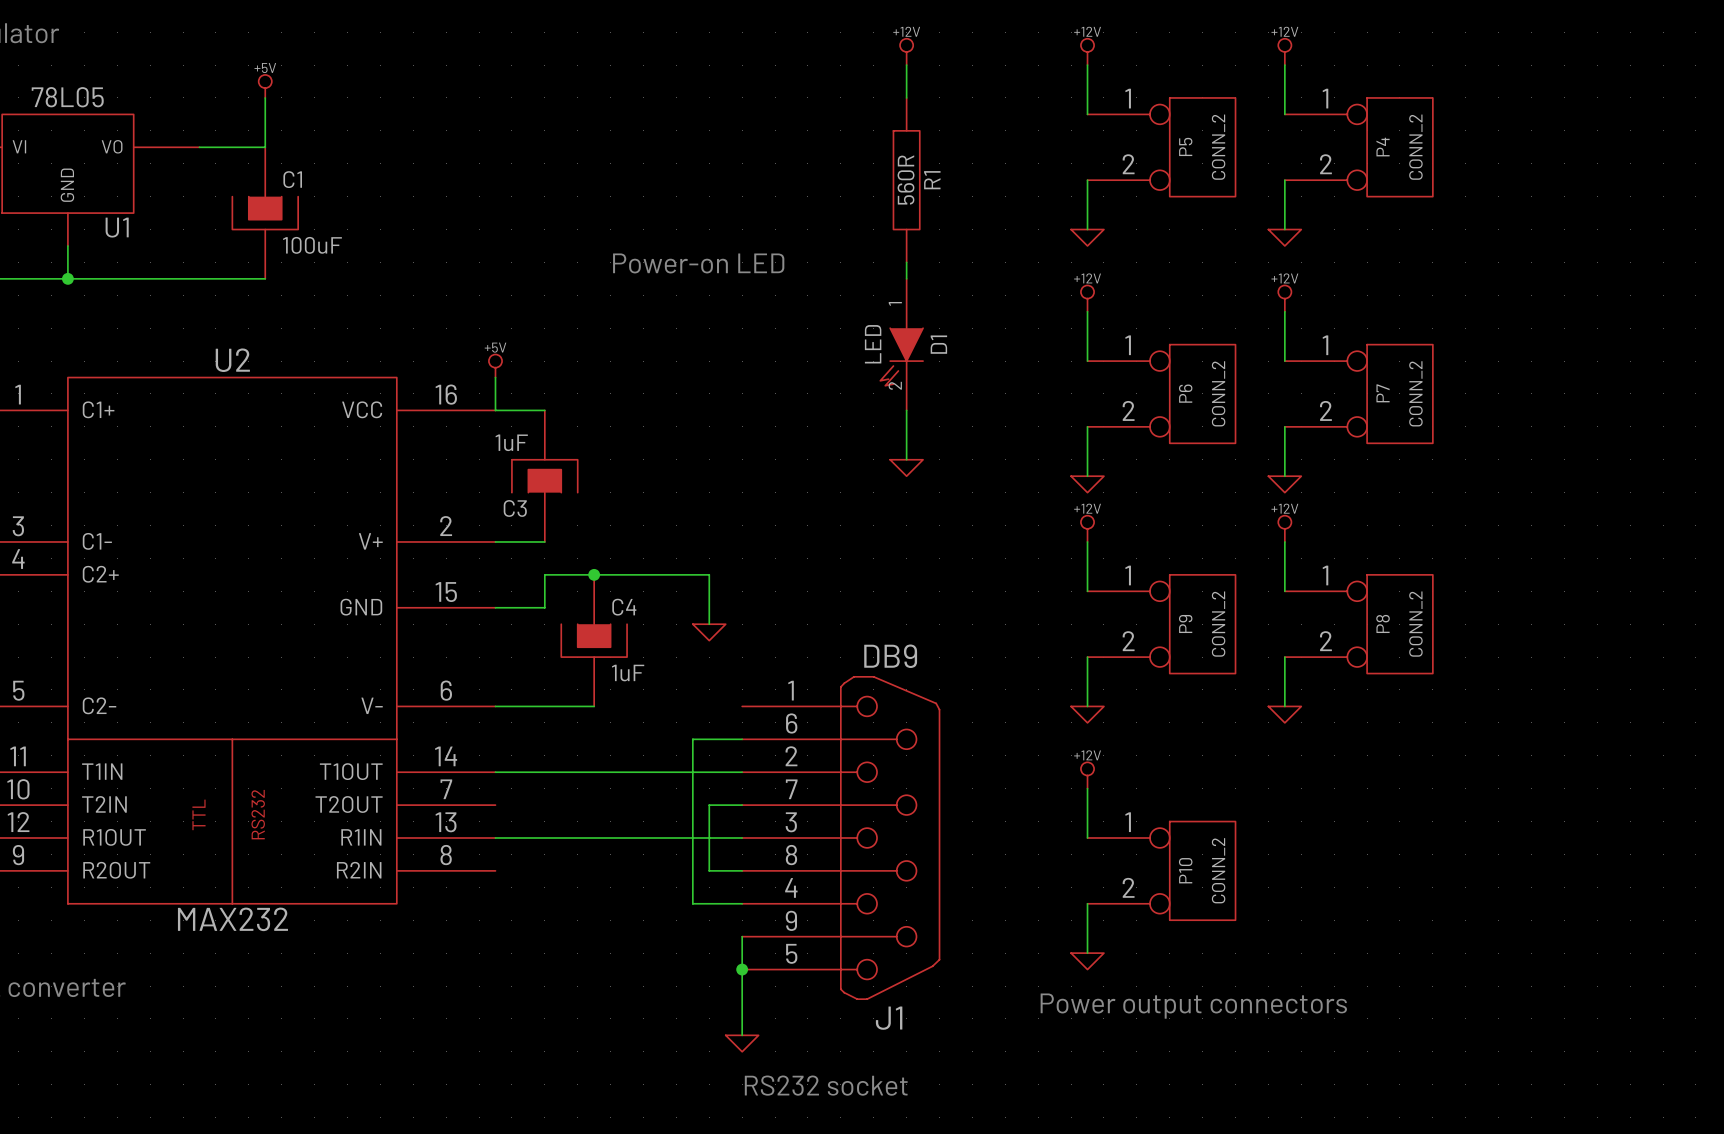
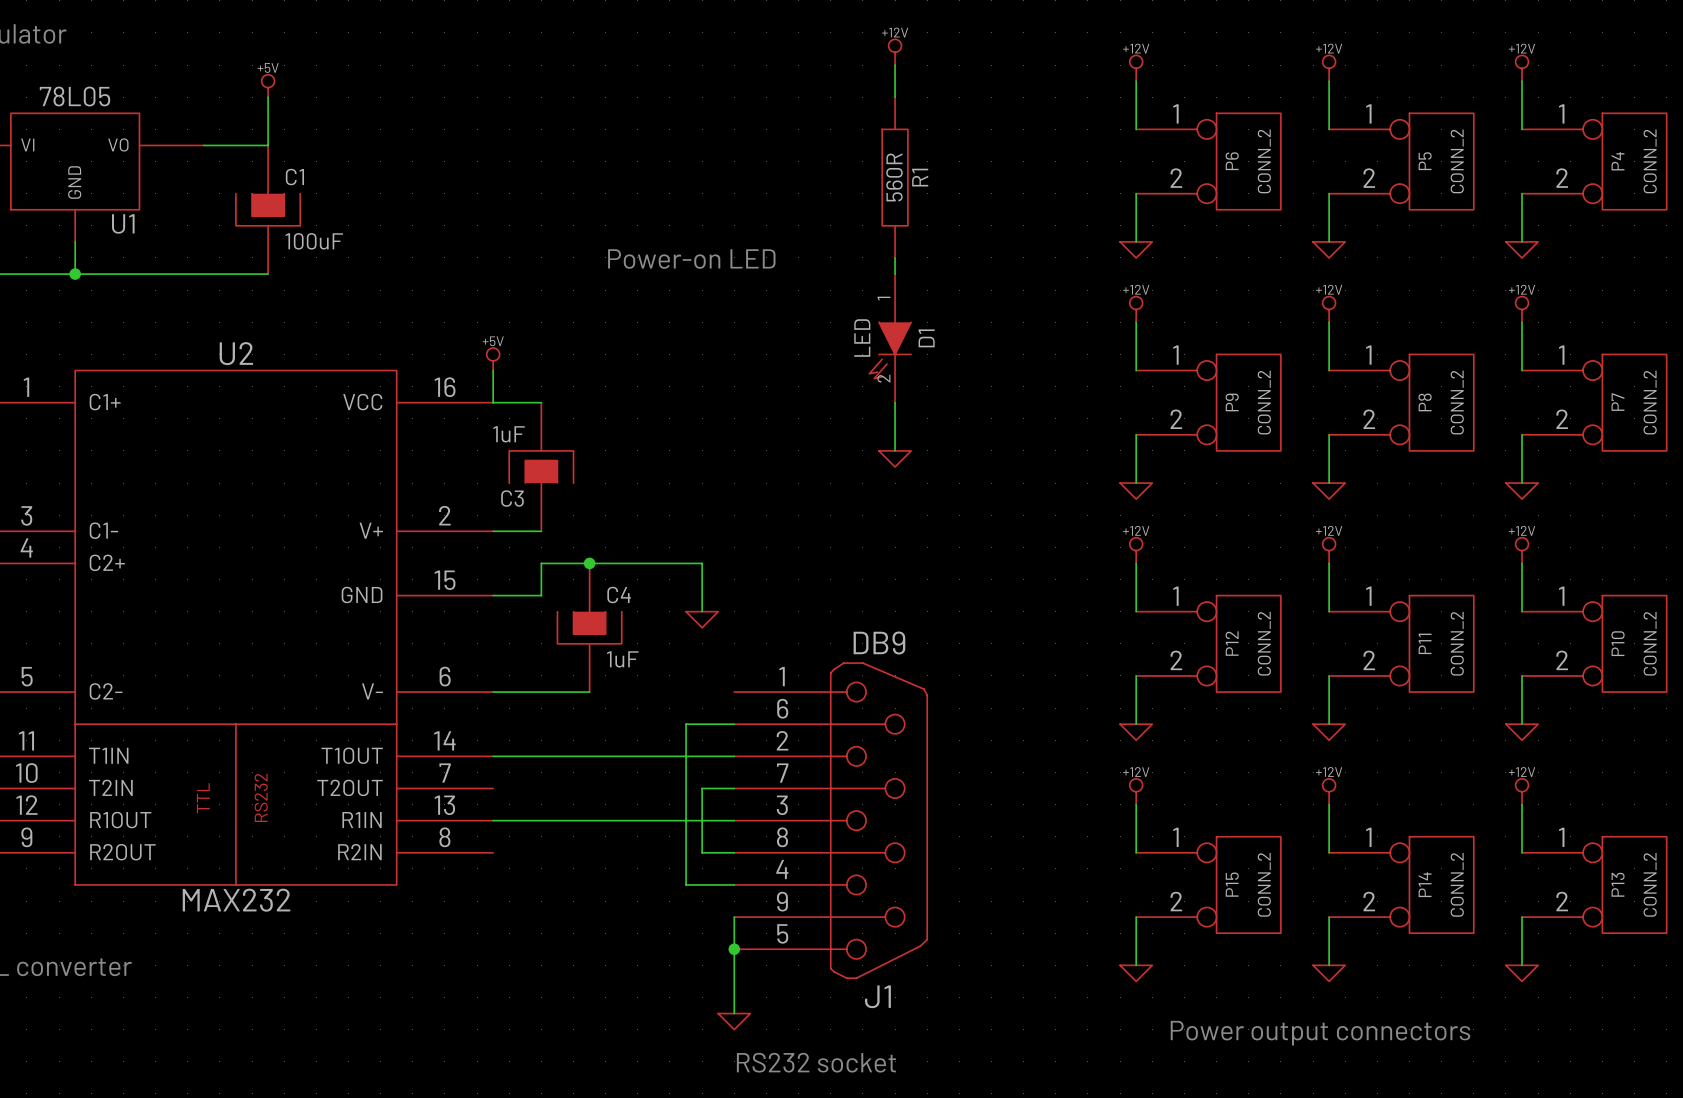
power symbol: +12V (1087, 51) -> none
power symbol: +12V (1284, 51) -> none
wire: (1087, 65) (1087, 114) -> (1136, 81) (1136, 129)
wire: (1284, 65) (1284, 114) -> (1329, 81) (1329, 129)
power symbol: none -> +12V (1136, 68)
power symbol: none -> +12V (1329, 68)
power symbol: none -> +12V (1522, 68)
wire: none -> (1522, 81) (1522, 129)
P5 position: (1161, 147) -> (1401, 161)
P4 position: (1358, 147) -> (1594, 161)
wire: (1087, 180) (1087, 229) -> (1136, 193) (1136, 241)
wire: (1284, 180) (1284, 229) -> (1329, 193) (1329, 241)
wire: none -> (1522, 193) (1522, 241)
power symbol: (1087, 237) -> none
power symbol: (1284, 237) -> none
power symbol: none -> (1136, 249)
power symbol: none -> (1329, 249)
power symbol: none -> (1522, 249)
power symbol: +12V (1087, 298) -> none
power symbol: +12V (1284, 298) -> none
wire: (1087, 311) (1087, 361) -> (1136, 322) (1136, 370)
wire: (1284, 311) (1284, 361) -> (1329, 322) (1329, 370)
power symbol: none -> +12V (1136, 309)
power symbol: none -> +12V (1329, 309)
power symbol: none -> +12V (1522, 309)
wire: none -> (1522, 322) (1522, 370)
P6 position: (1161, 393) -> (1208, 161)
P7 position: (1358, 393) -> (1594, 402)
wire: (1087, 426) (1087, 476) -> (1136, 434) (1136, 483)
wire: (1284, 426) (1284, 476) -> (1329, 434) (1329, 483)
wire: none -> (1522, 434) (1522, 483)
power symbol: (1087, 484) -> none
power symbol: (1284, 484) -> none
power symbol: none -> (1136, 491)
power symbol: none -> (1329, 491)
power symbol: none -> (1522, 491)
power symbol: +12V (1087, 528) -> none
power symbol: +12V (1284, 528) -> none
wire: (1087, 541) (1087, 591) -> (1136, 563) (1136, 611)
wire: (1284, 541) (1284, 591) -> (1329, 675) (1329, 724)
power symbol: none -> +12V (1136, 550)
power symbol: none -> +12V (1329, 550)
power symbol: none -> +12V (1522, 550)
wire: none -> (1522, 563) (1522, 611)
P9 position: (1161, 624) -> (1208, 402)
P8 position: (1358, 624) -> (1401, 402)
wire: (1087, 657) (1087, 706) -> (1329, 563) (1329, 611)
P12: none -> CONN_2 (1208, 643)
wire: (1284, 657) (1284, 706) -> (1522, 675) (1522, 724)
P11: none -> CONN_2 (1401, 643)
power symbol: (1087, 714) -> none
power symbol: (1284, 714) -> none
power symbol: none -> (1136, 732)
power symbol: none -> (1329, 732)
power symbol: none -> (1522, 732)
power symbol position: +12V (1087, 775) -> +12V (1136, 791)
wire: (1087, 788) (1087, 838) -> (1136, 675) (1136, 724)
power symbol: none -> +12V (1329, 791)
power symbol: none -> +12V (1522, 791)
wire: none -> (1136, 804) (1136, 852)
wire: none -> (1329, 804) (1329, 852)
wire: none -> (1522, 804) (1522, 852)
P10 position: (1161, 870) -> (1594, 643)
wire: (1087, 903) (1087, 953) -> (1136, 917) (1136, 965)
P15: none -> CONN_2 (1208, 884)
P14: none -> CONN_2 (1401, 884)
P13: none -> CONN_2 (1594, 884)
wire: none -> (1329, 917) (1329, 965)
wire: none -> (1522, 917) (1522, 965)
power symbol position: (1087, 961) -> (1136, 973)
power symbol: none -> (1329, 973)
power symbol: none -> (1522, 973)
text position: Power output connectors (1193, 1006) -> Power output connectors (1320, 1033)

